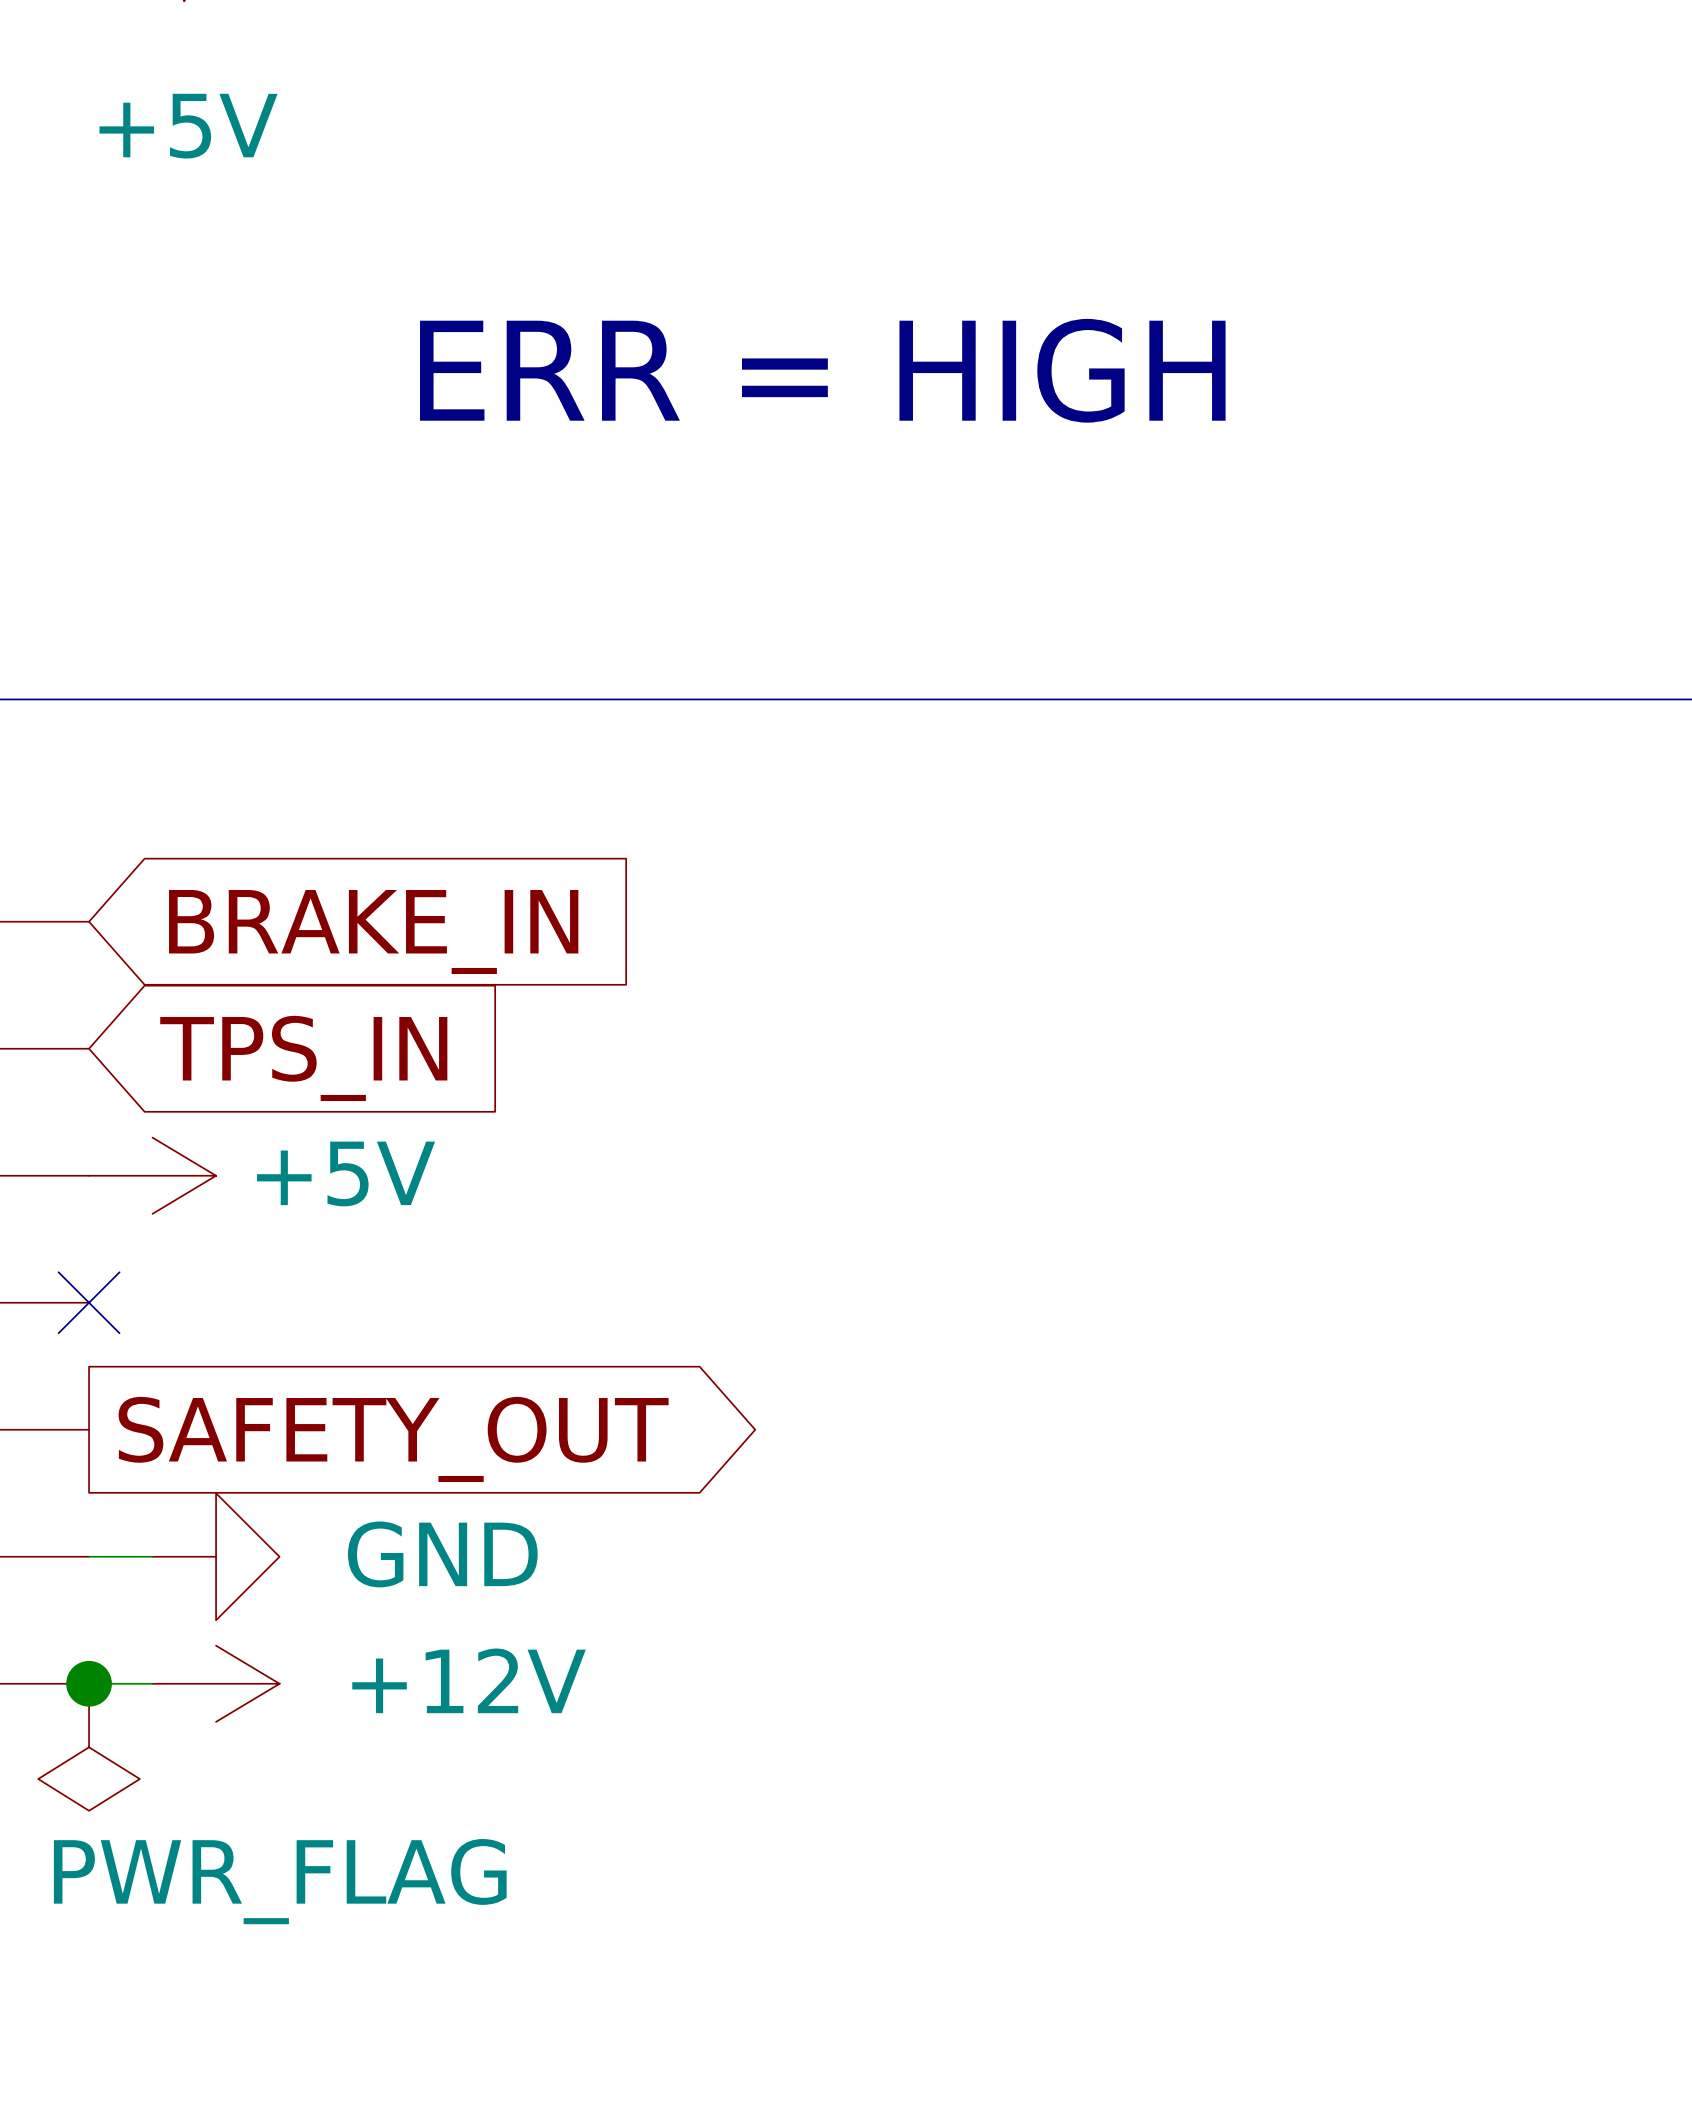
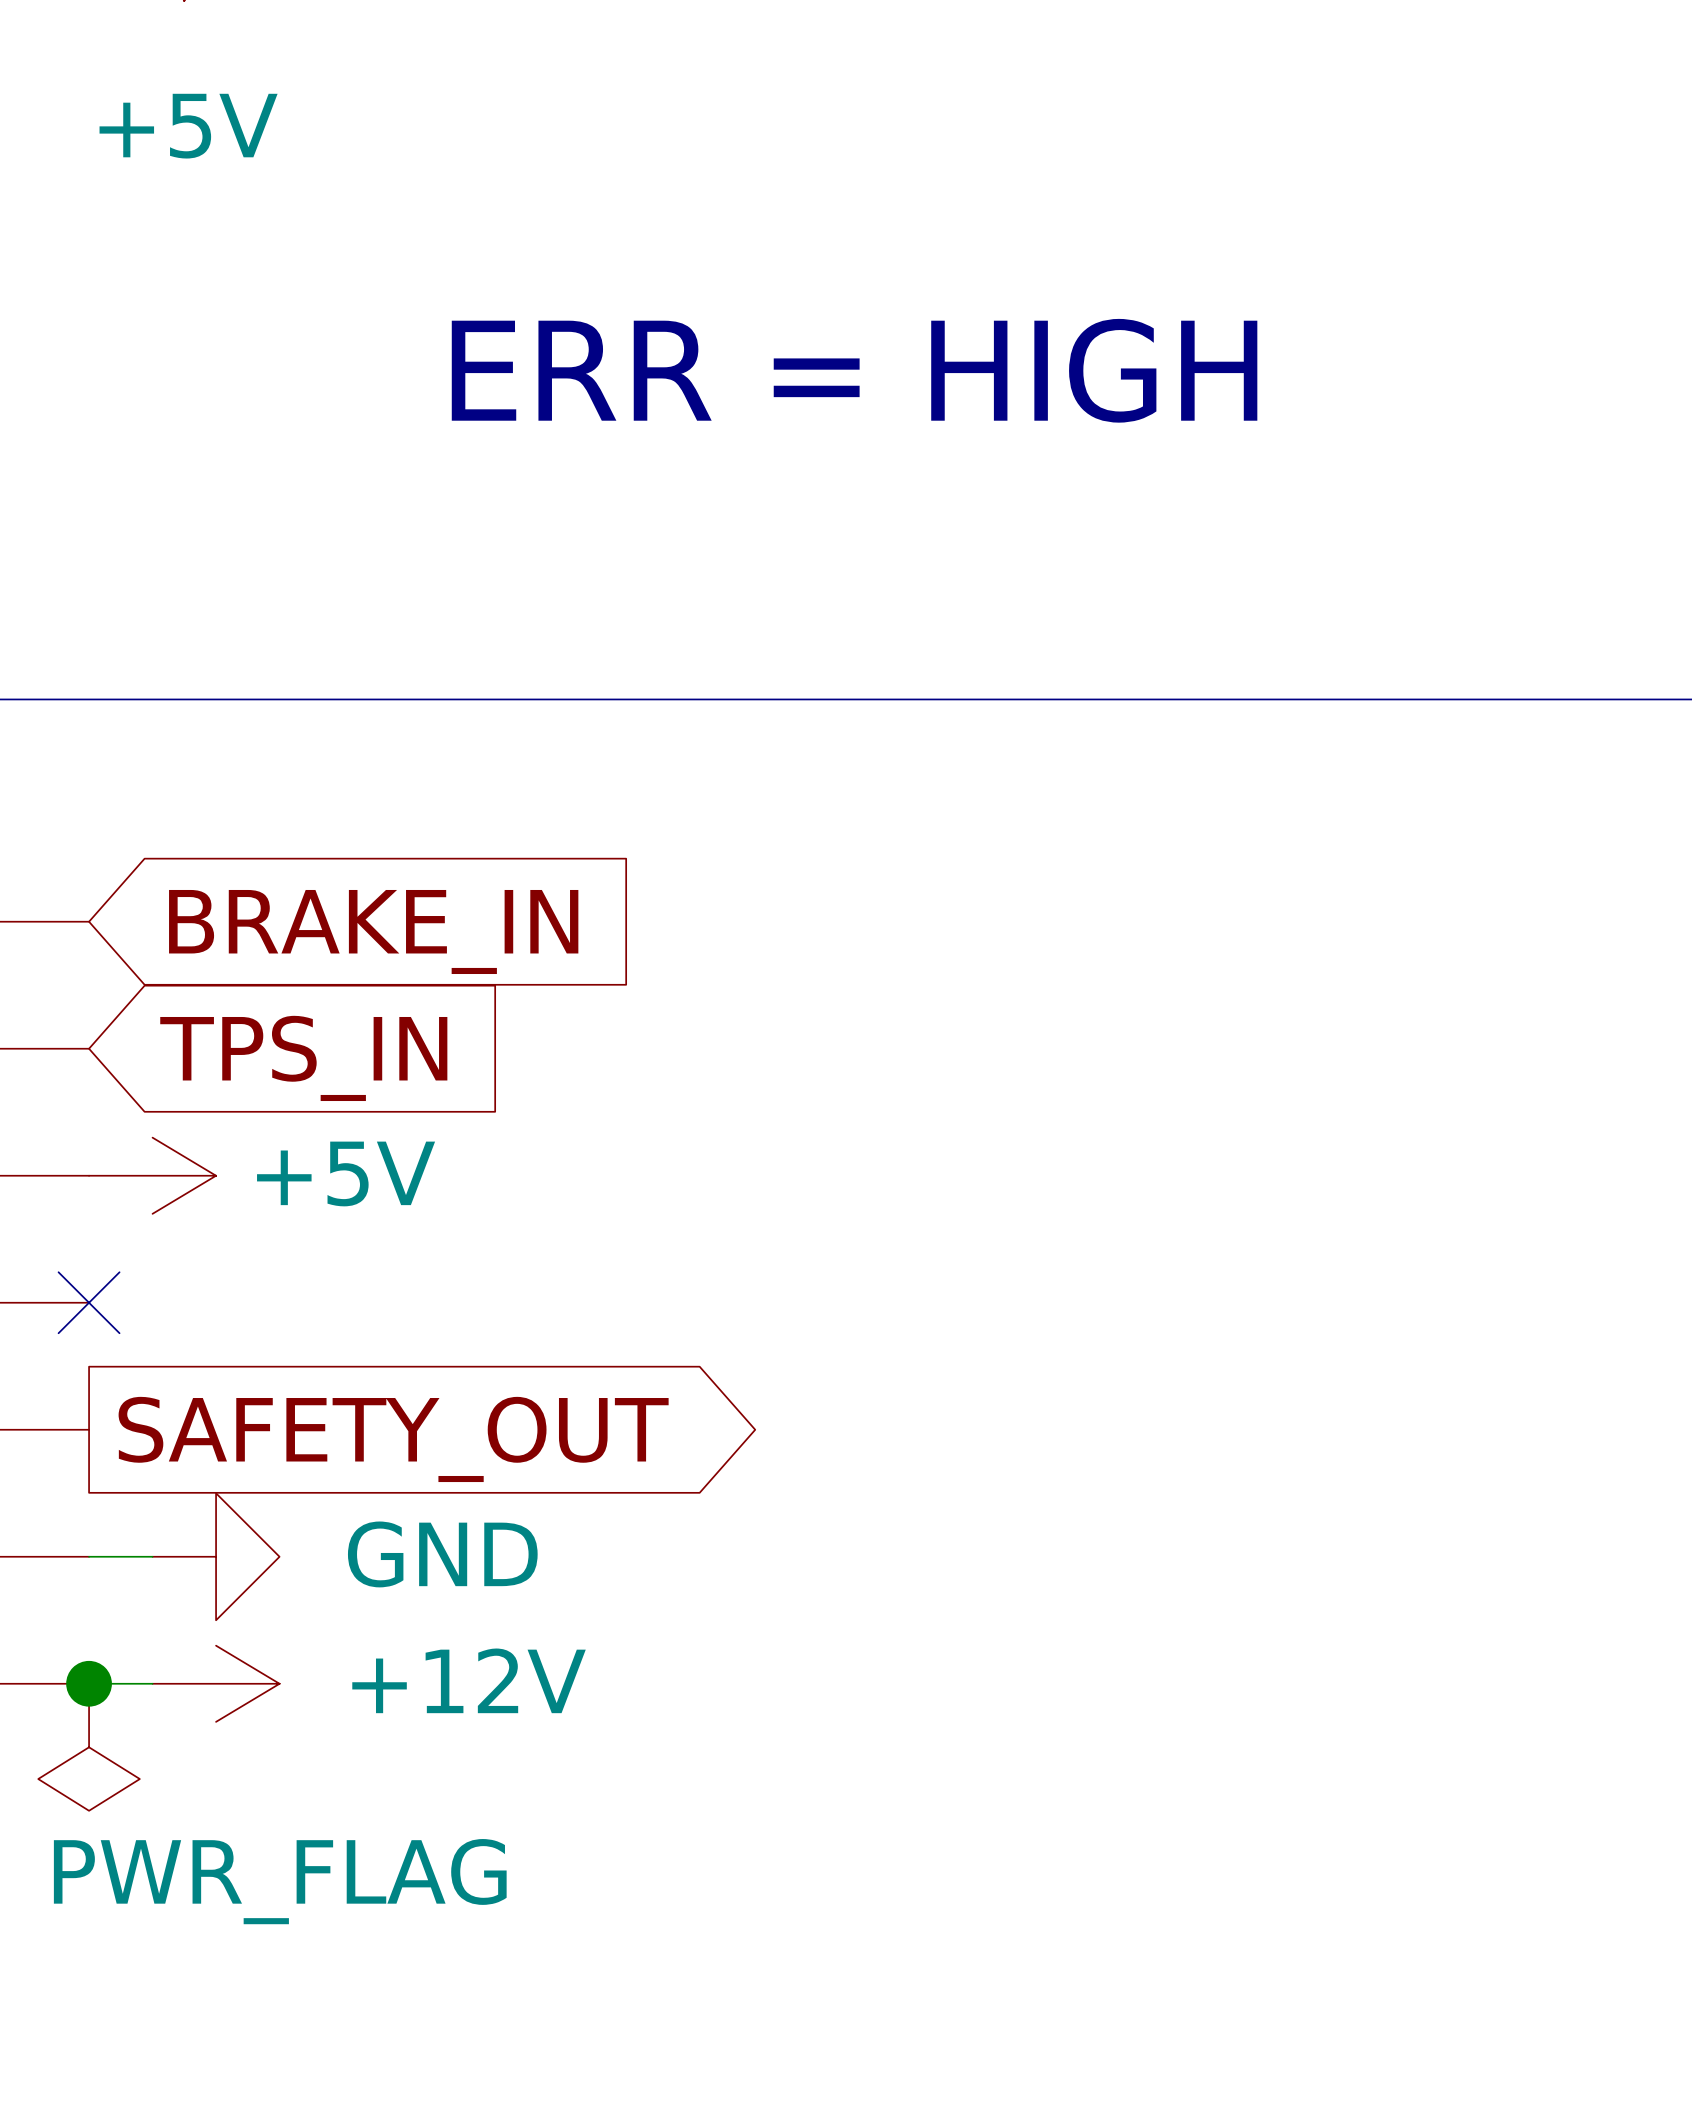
text position: ERR = HIGH (822, 370) -> ERR = HIGH (854, 370)

